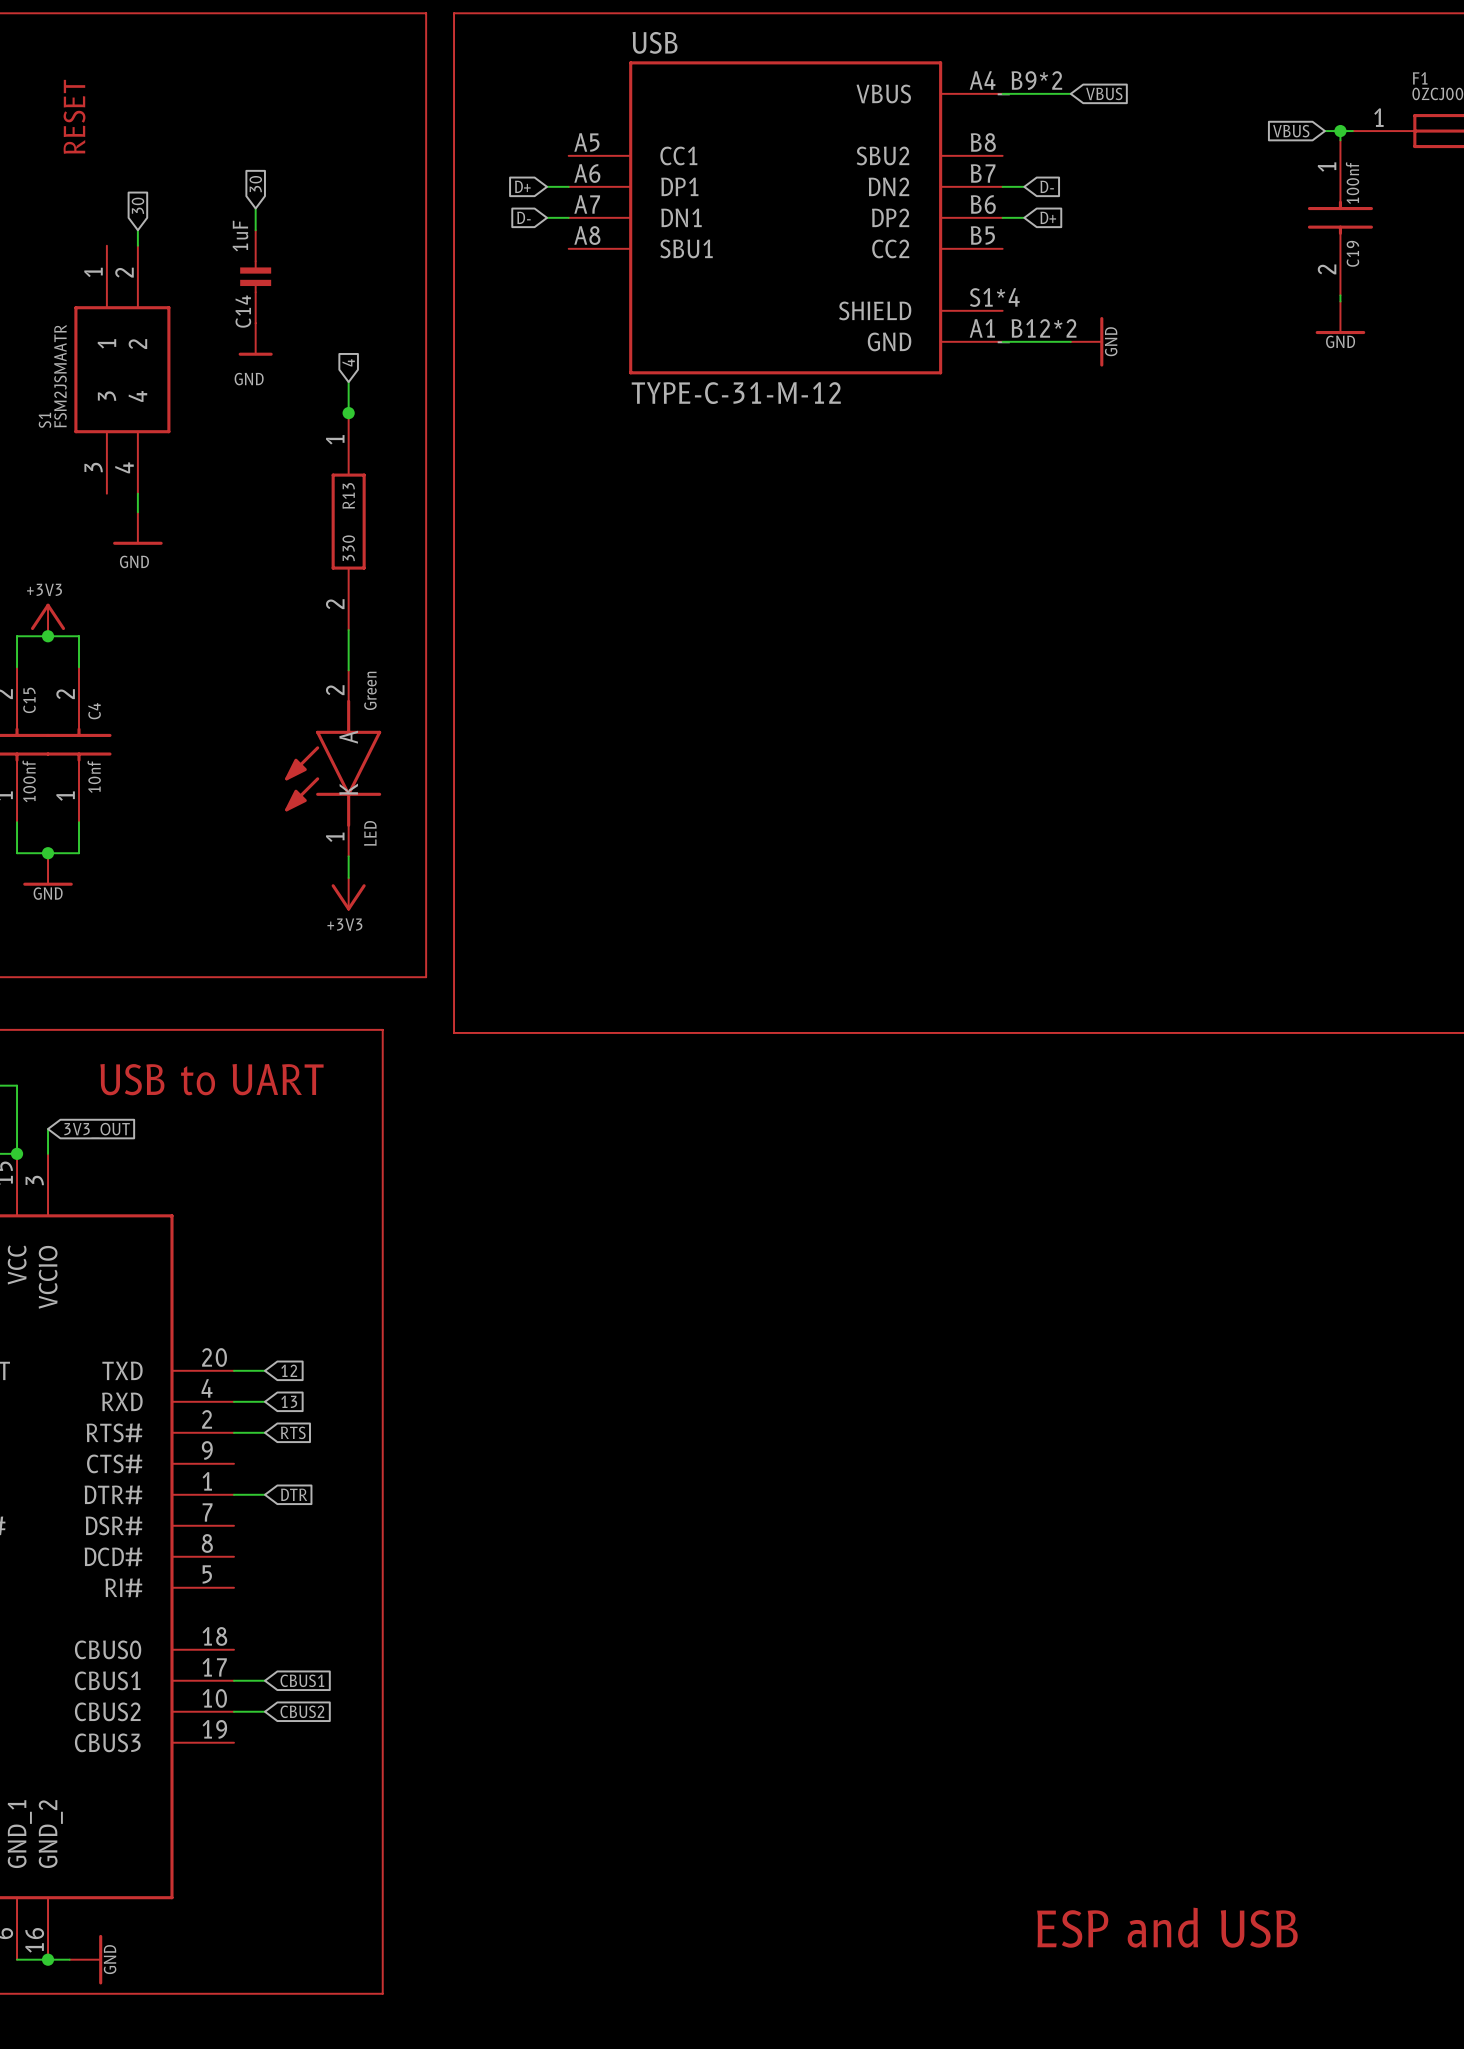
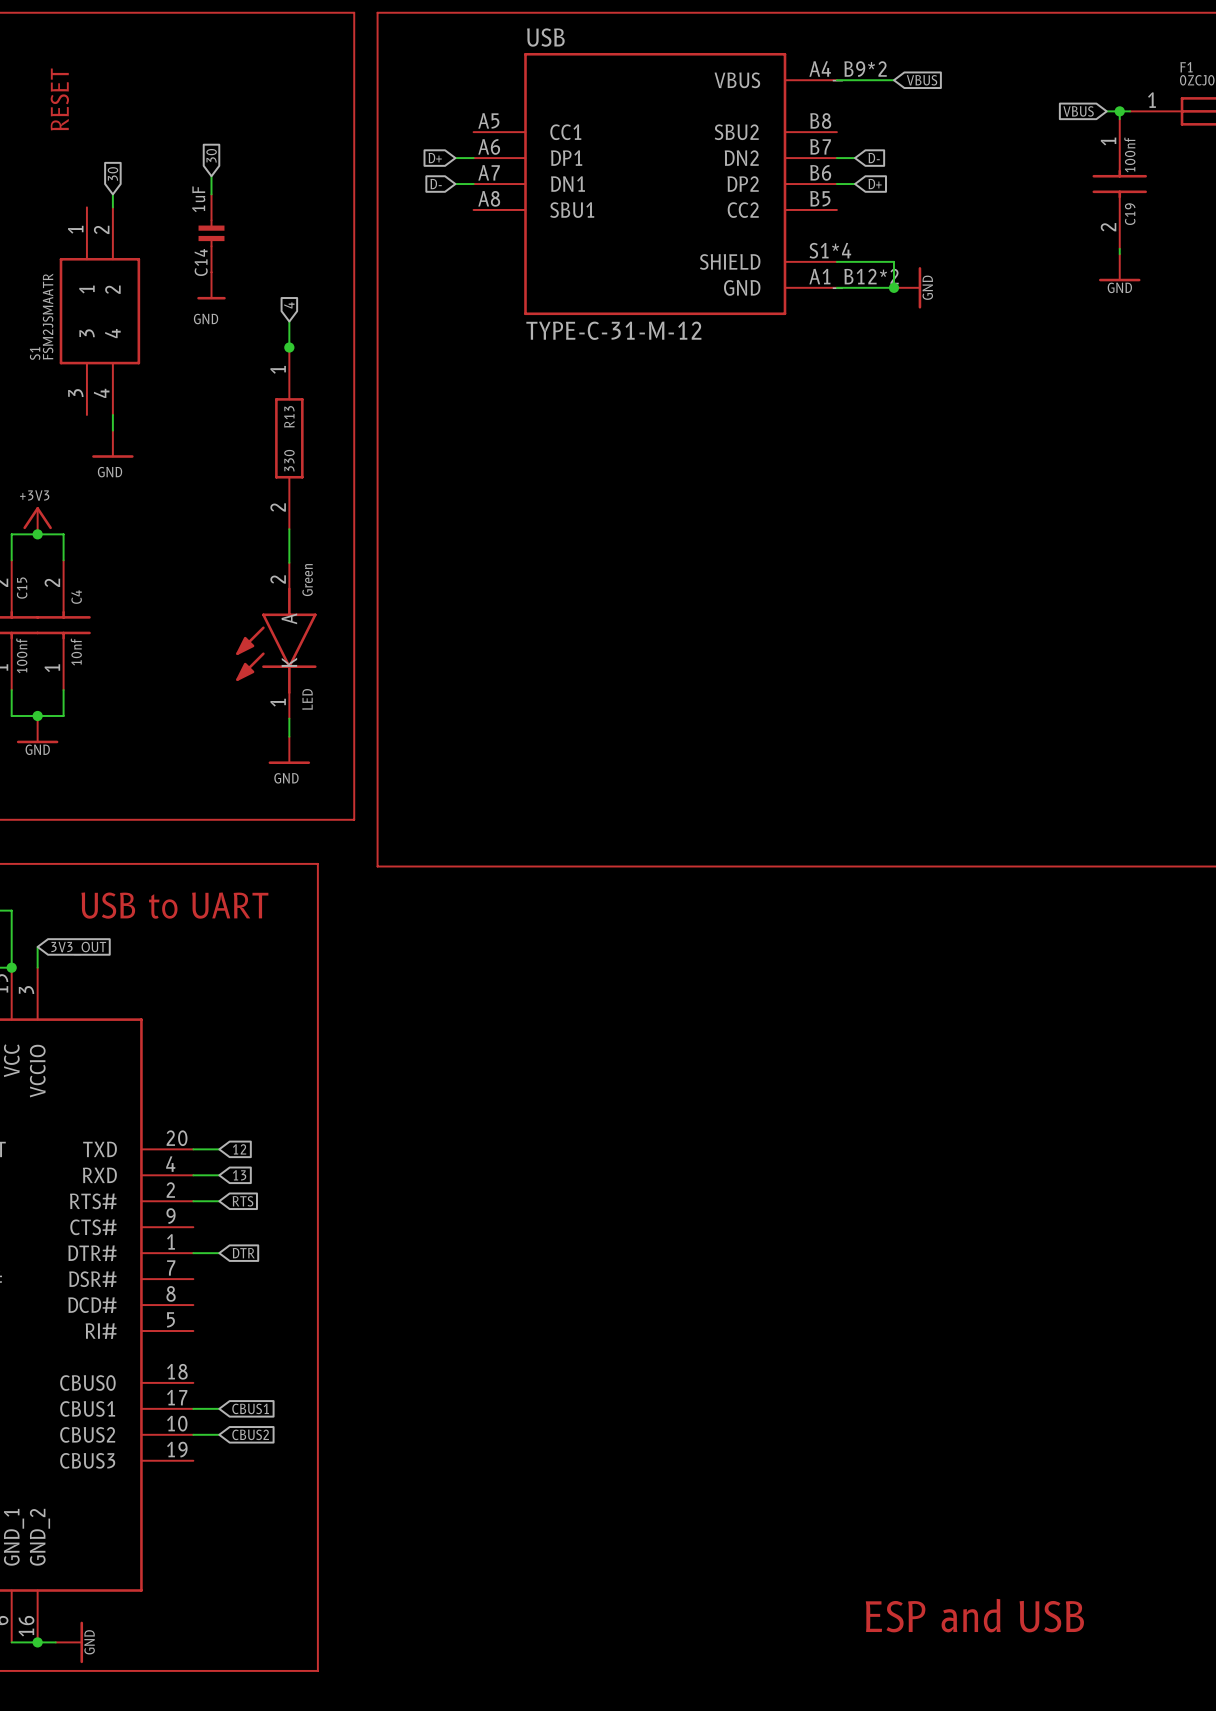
wire: none -> (836, 261) (893, 261) (893, 287)
junction: none -> (893, 287)
power symbol: +3V3 (348, 894) -> GND (289, 750)

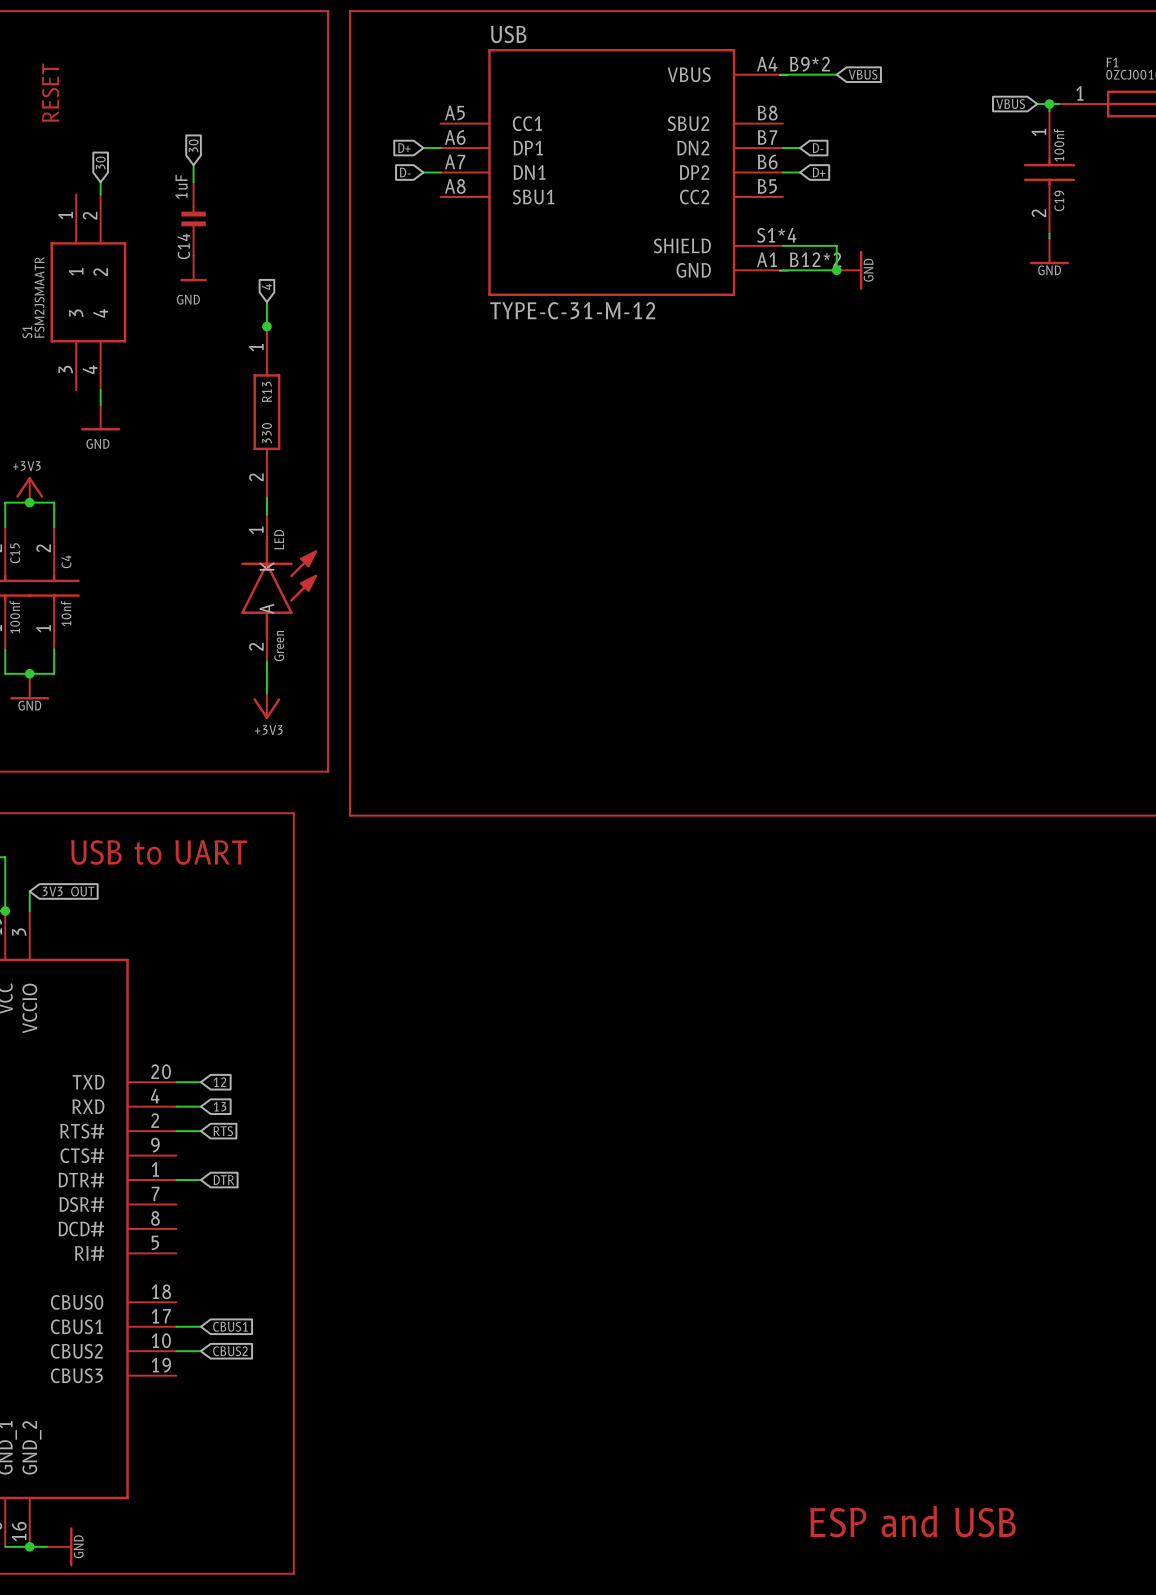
LED value position: Green (307, 580) -> Green (279, 646)
LED rotation: 0° (276, 640) -> 180° (279, 588)
LED name position: LED (307, 699) -> LED (279, 539)
power symbol: GND (289, 750) -> +3V3 (266, 706)

